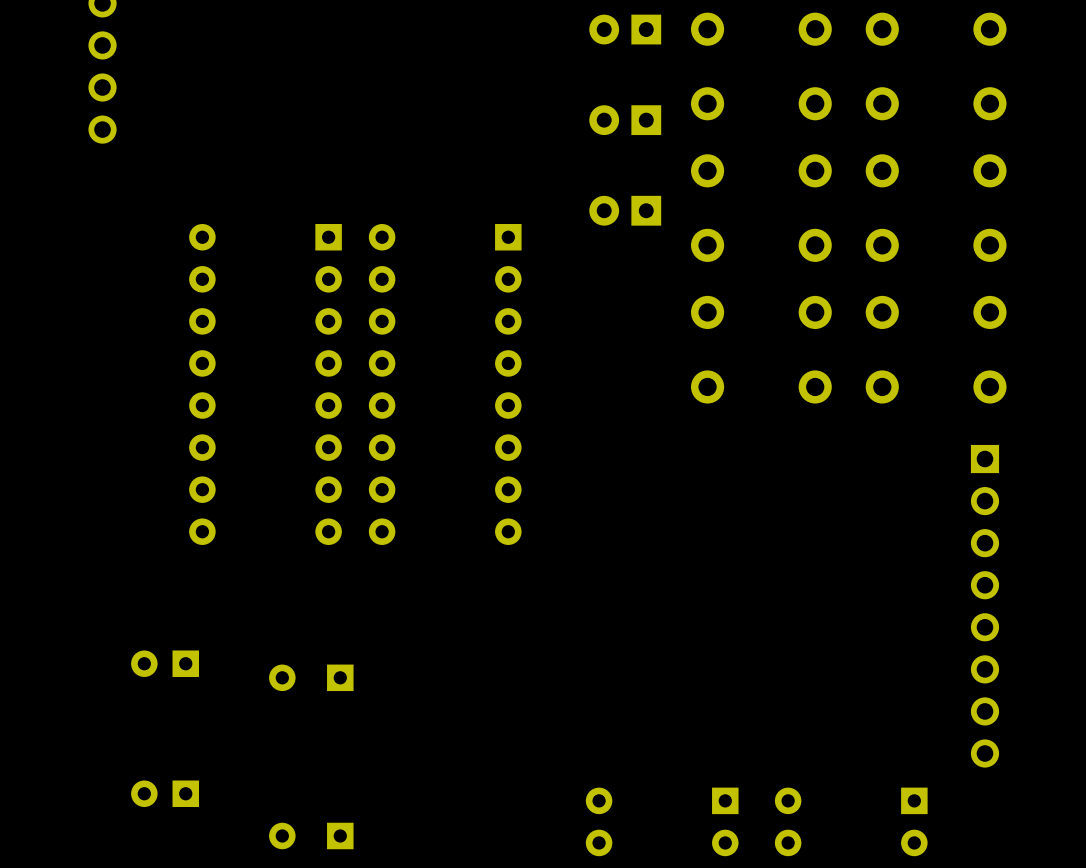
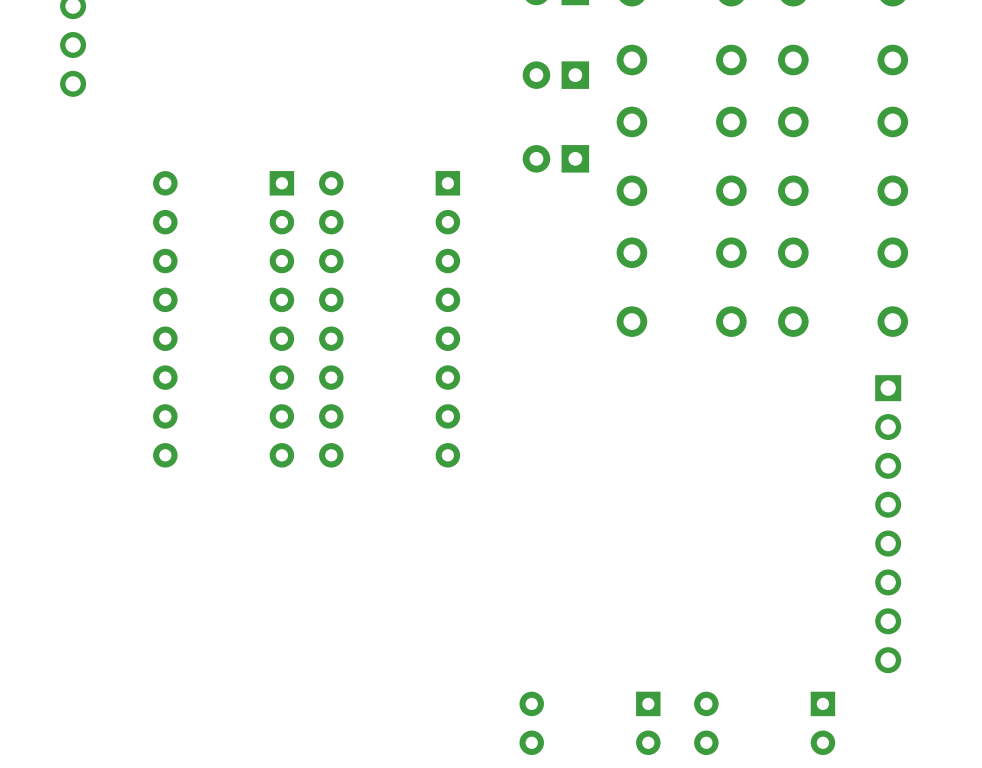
part: (165, 663) -> none
part: (311, 677) -> none
part: (165, 793) -> none
part: (311, 835) -> none

